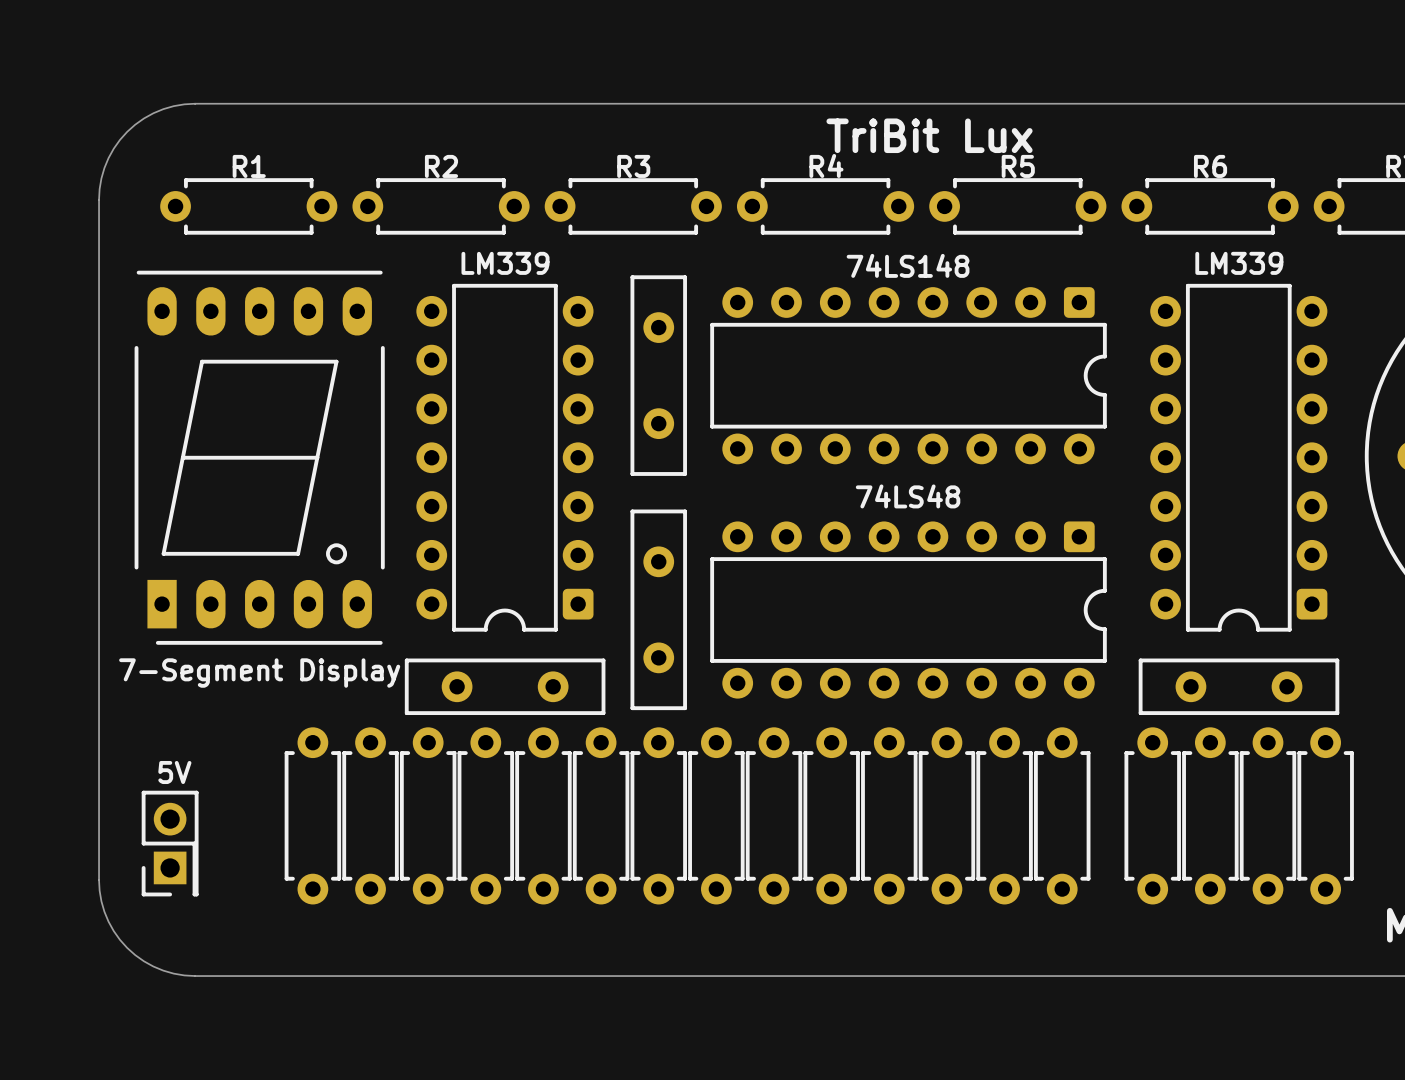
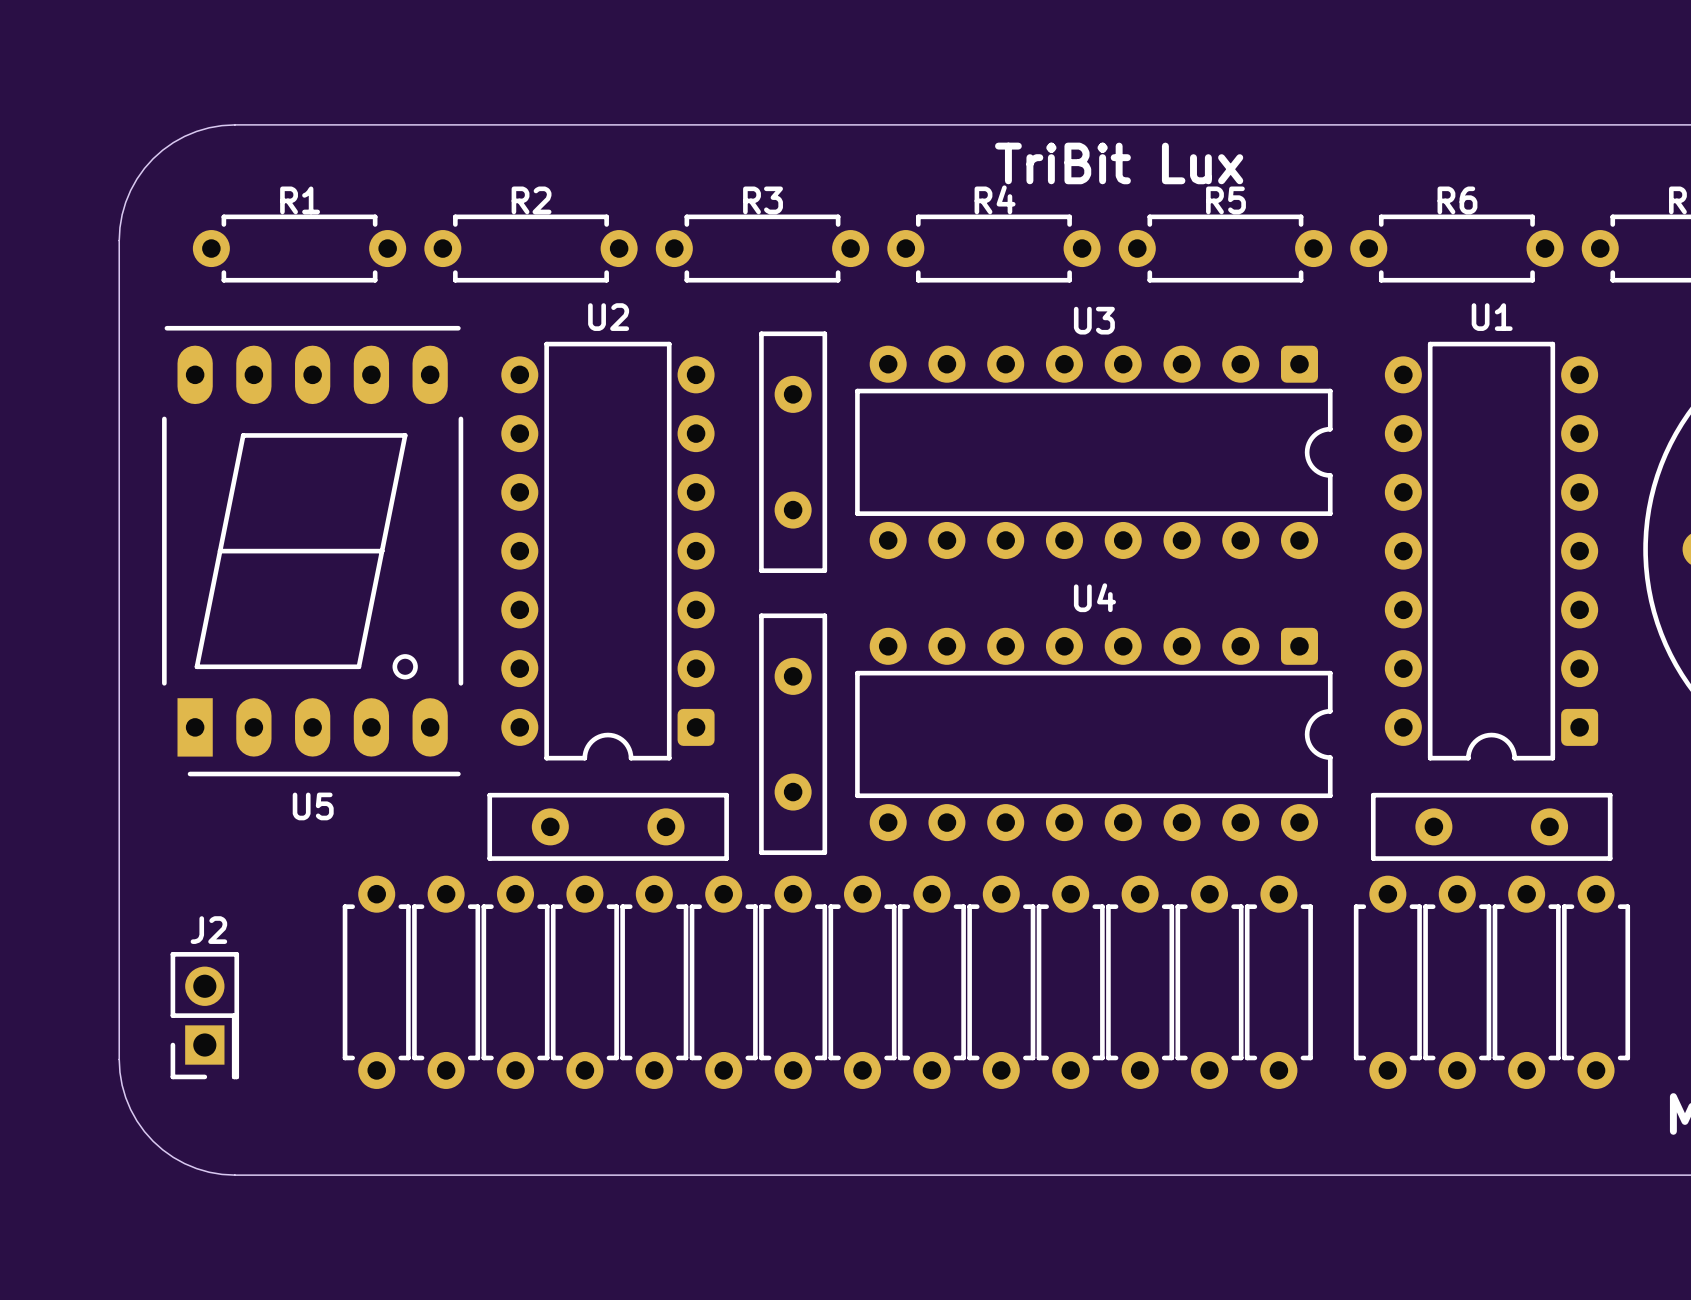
LM339 name: LM339 (505, 263) -> U2 (608, 317)
LM339 name: LM339 (1239, 263) -> U1 (1492, 317)
74LS148 name: 74LS148 (908, 265) -> U3 (1094, 320)
74LS48 name: 74LS48 (908, 496) -> U4 (1094, 597)
7-Segment Display name: 7-Segment Display (259, 673) -> U5 (313, 806)
5V name: 5V (174, 772) -> J2 (208, 930)

